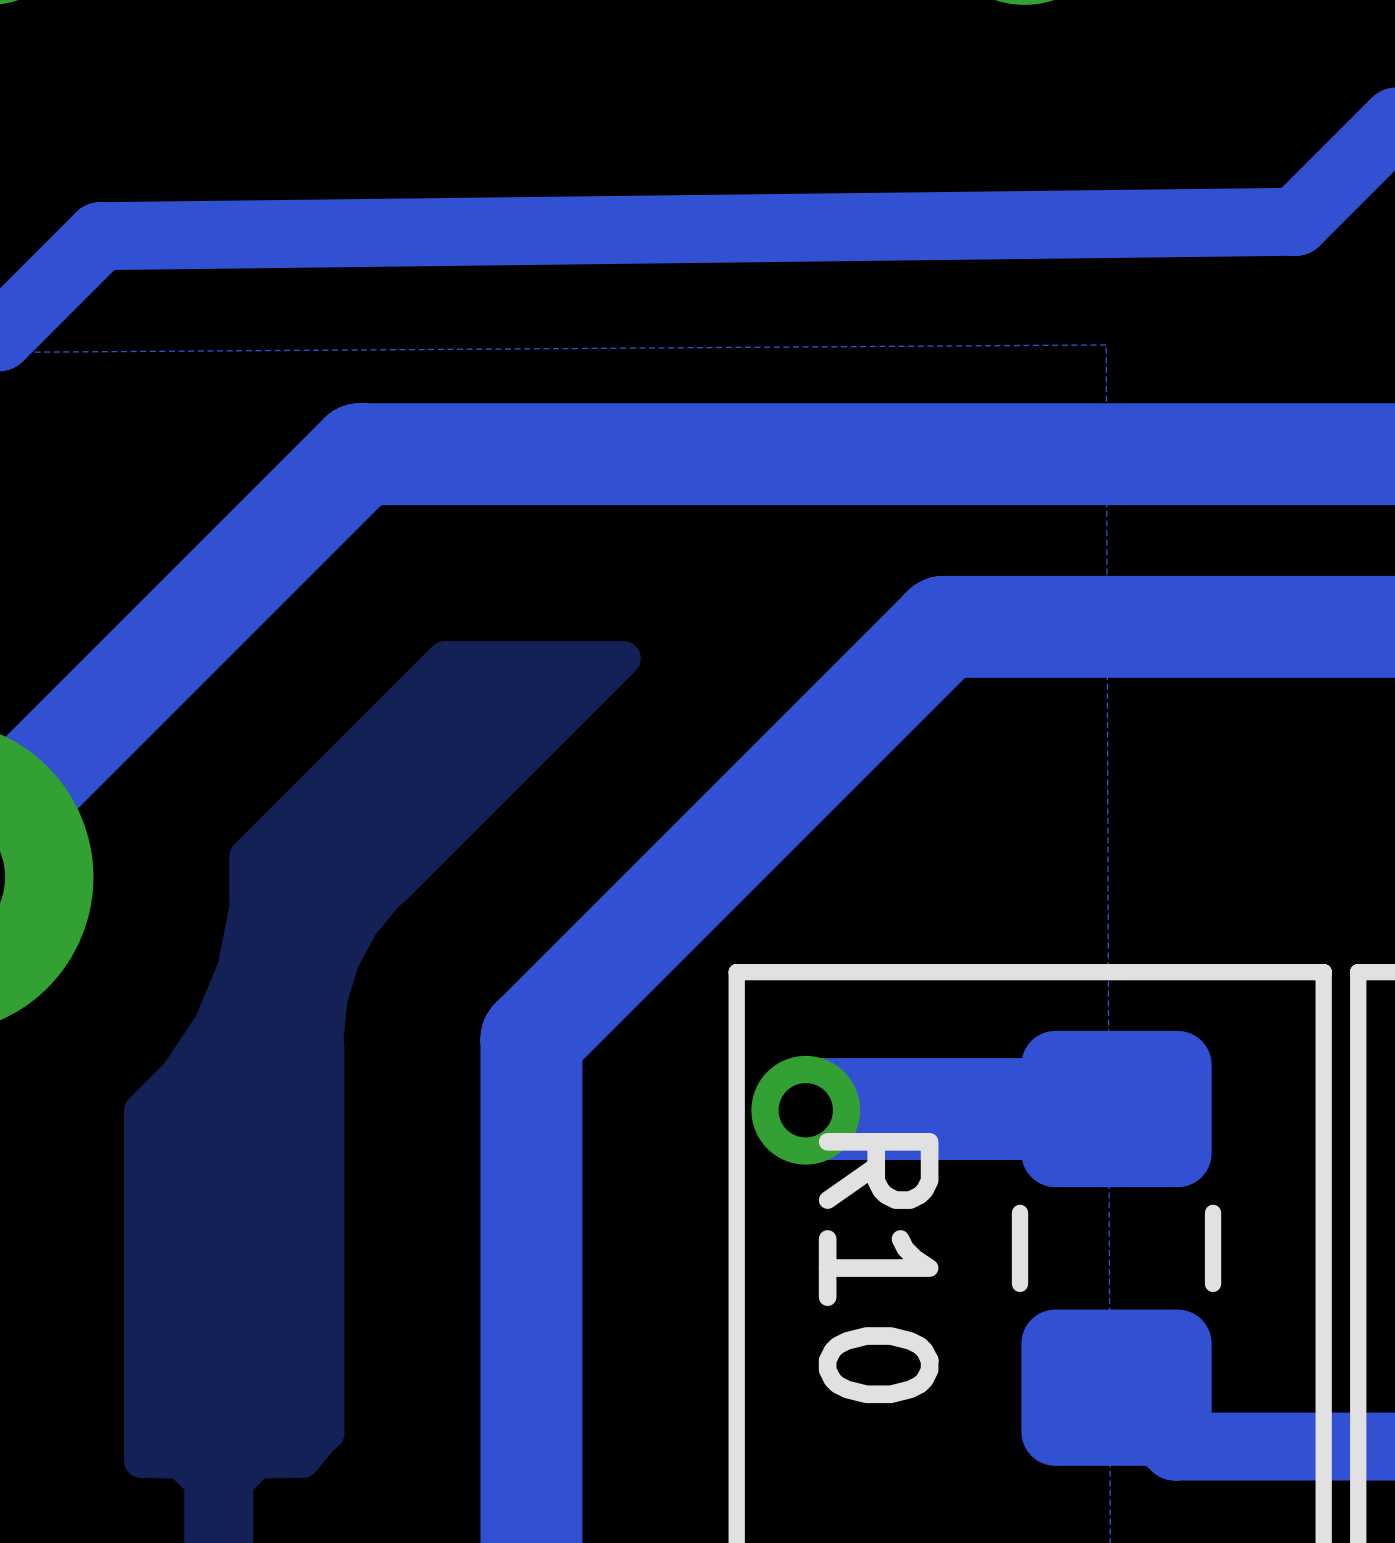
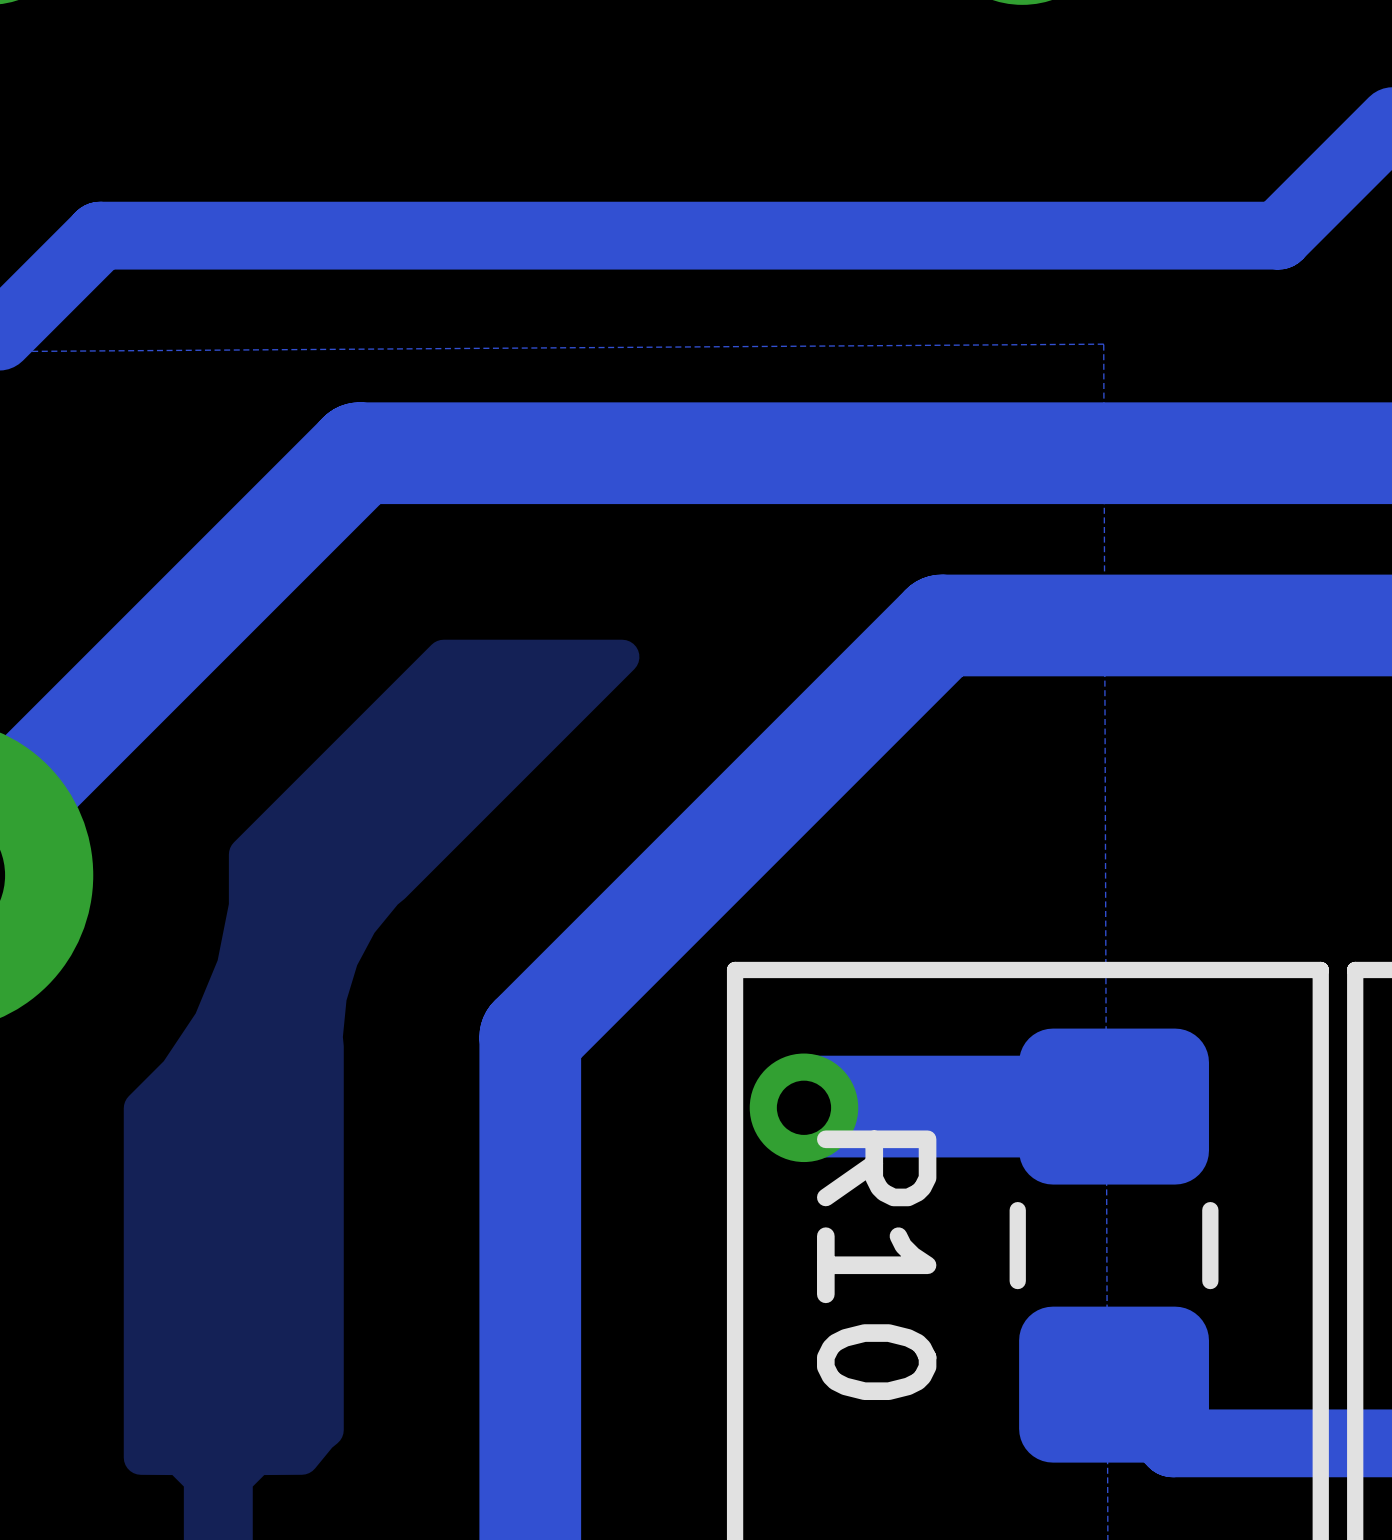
track: (1295, 221) (100, 236) -> (1292, 221) (1278, 235) (100, 235)

